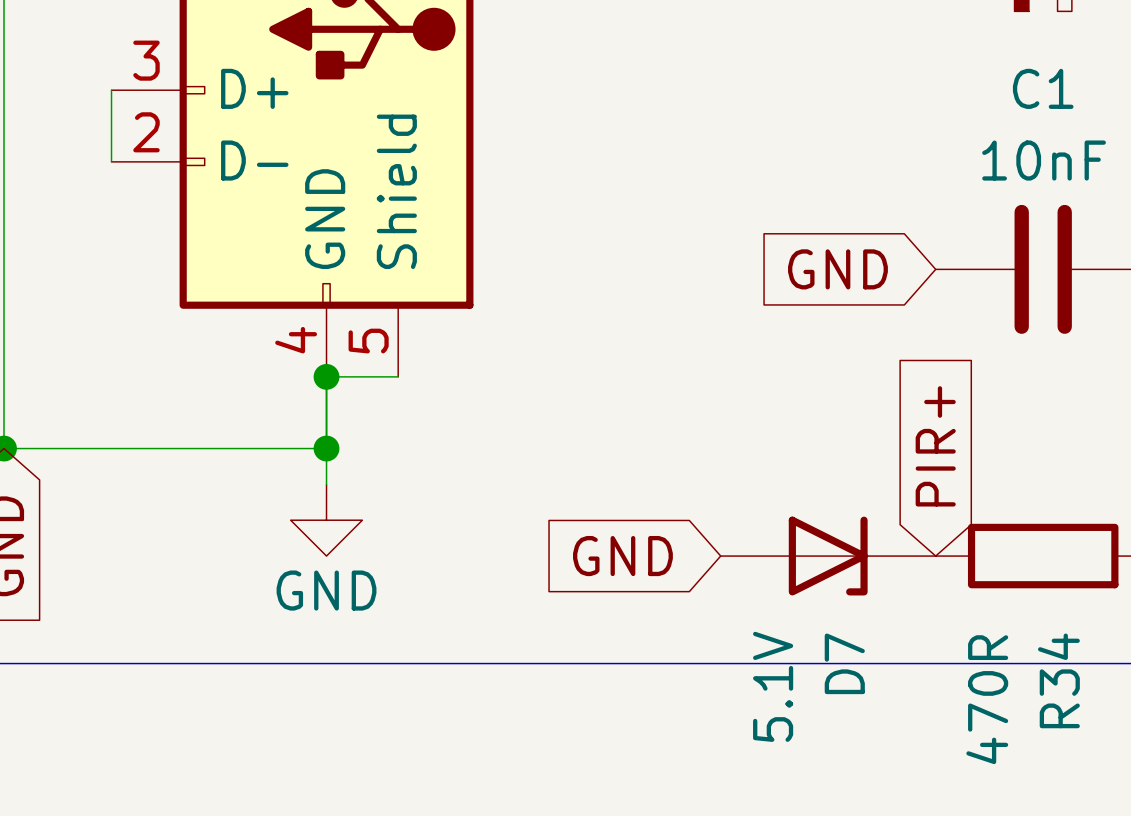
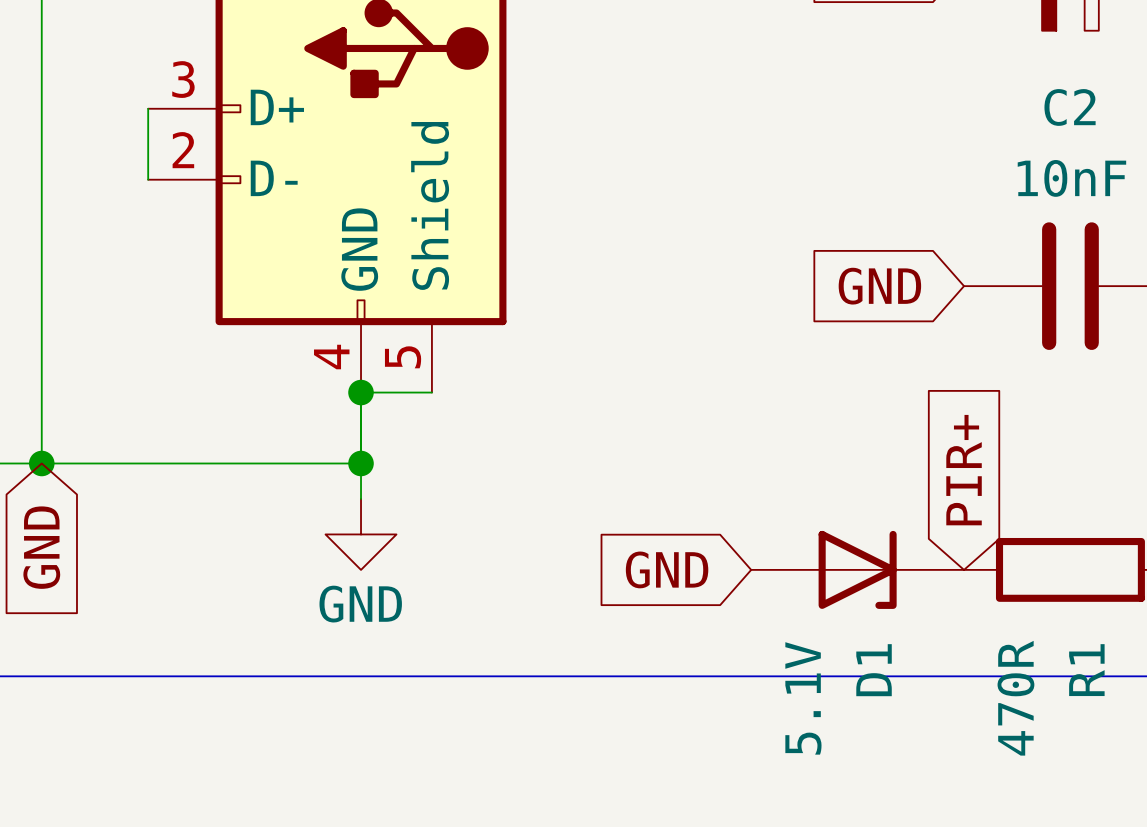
C1 name: C1 (1043, 88) -> C2 (1070, 107)
D7 name: D7 (844, 663) -> D1 (874, 670)
R34 name: R34 (1058, 680) -> R1 (1086, 670)

